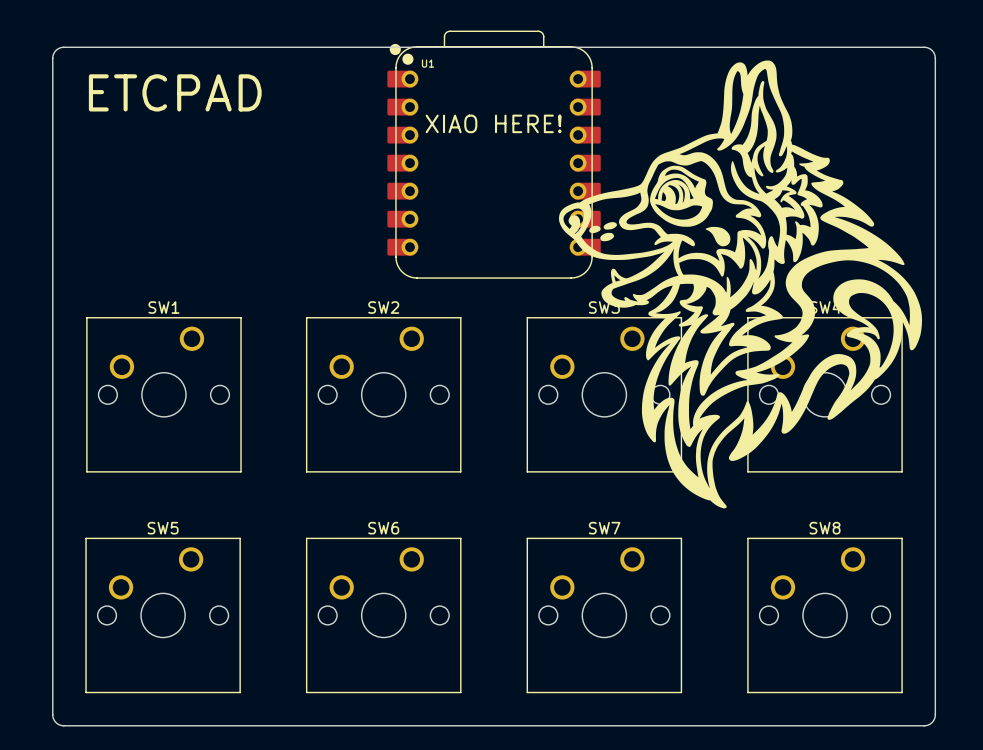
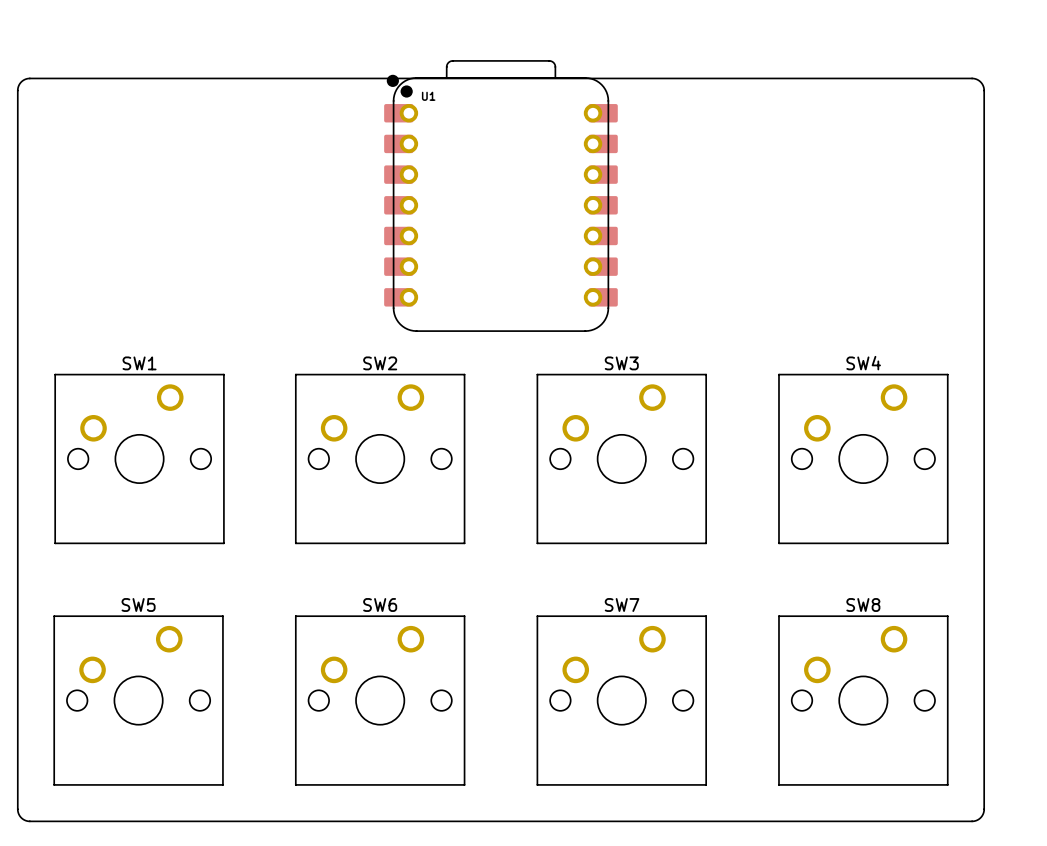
drawing: [558, 60, 923, 509] -> none
text: ETCPAD (175, 92) -> none
text: XIAO HERE! (493, 123) -> none

